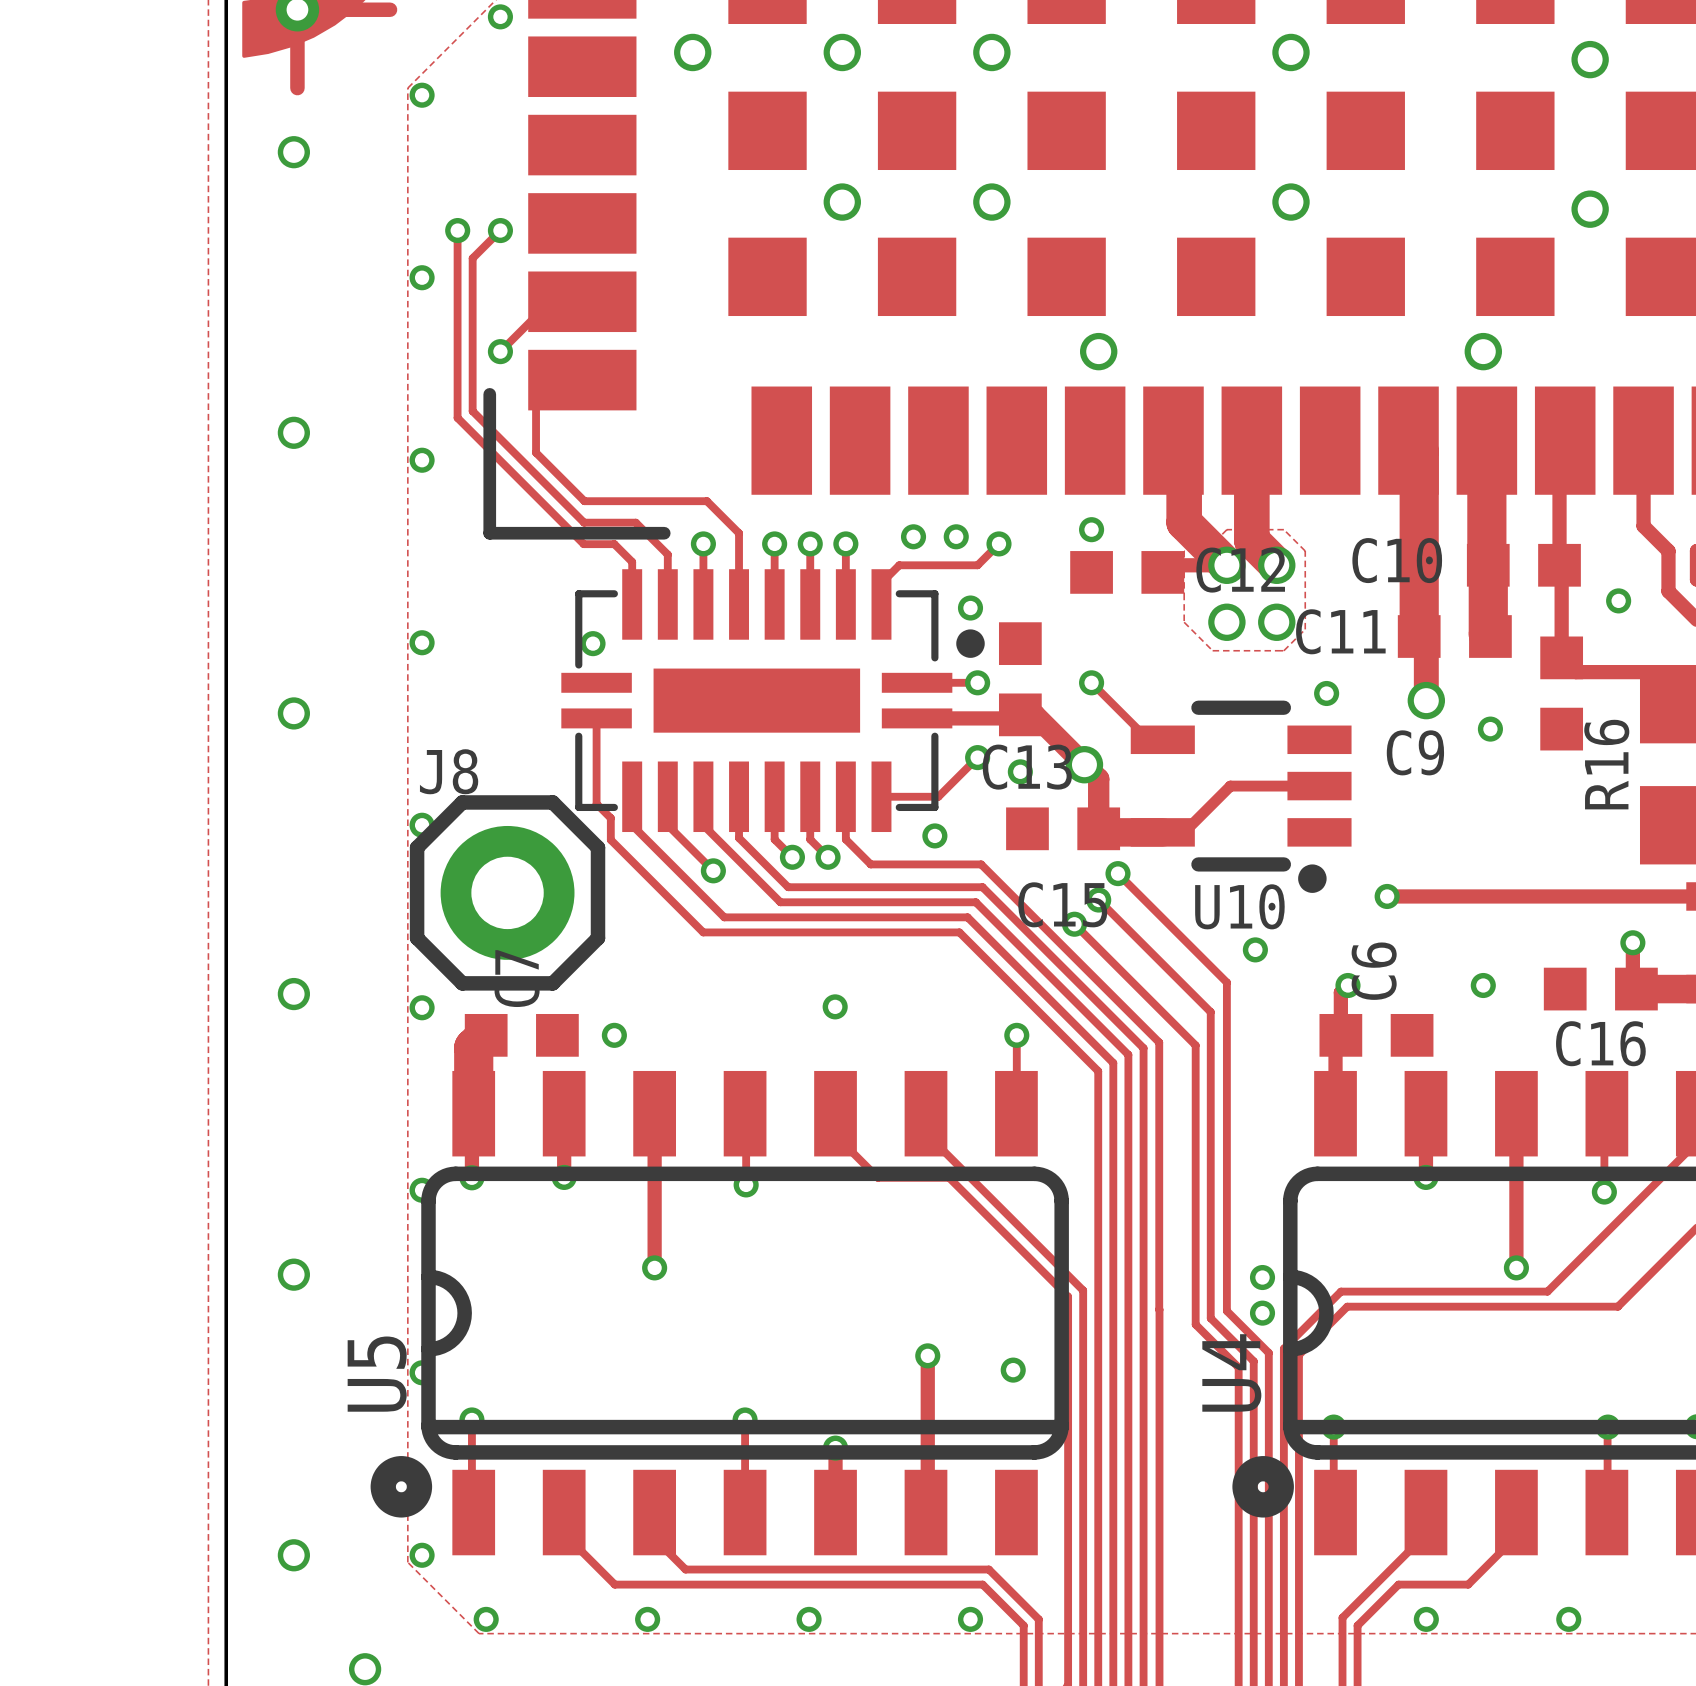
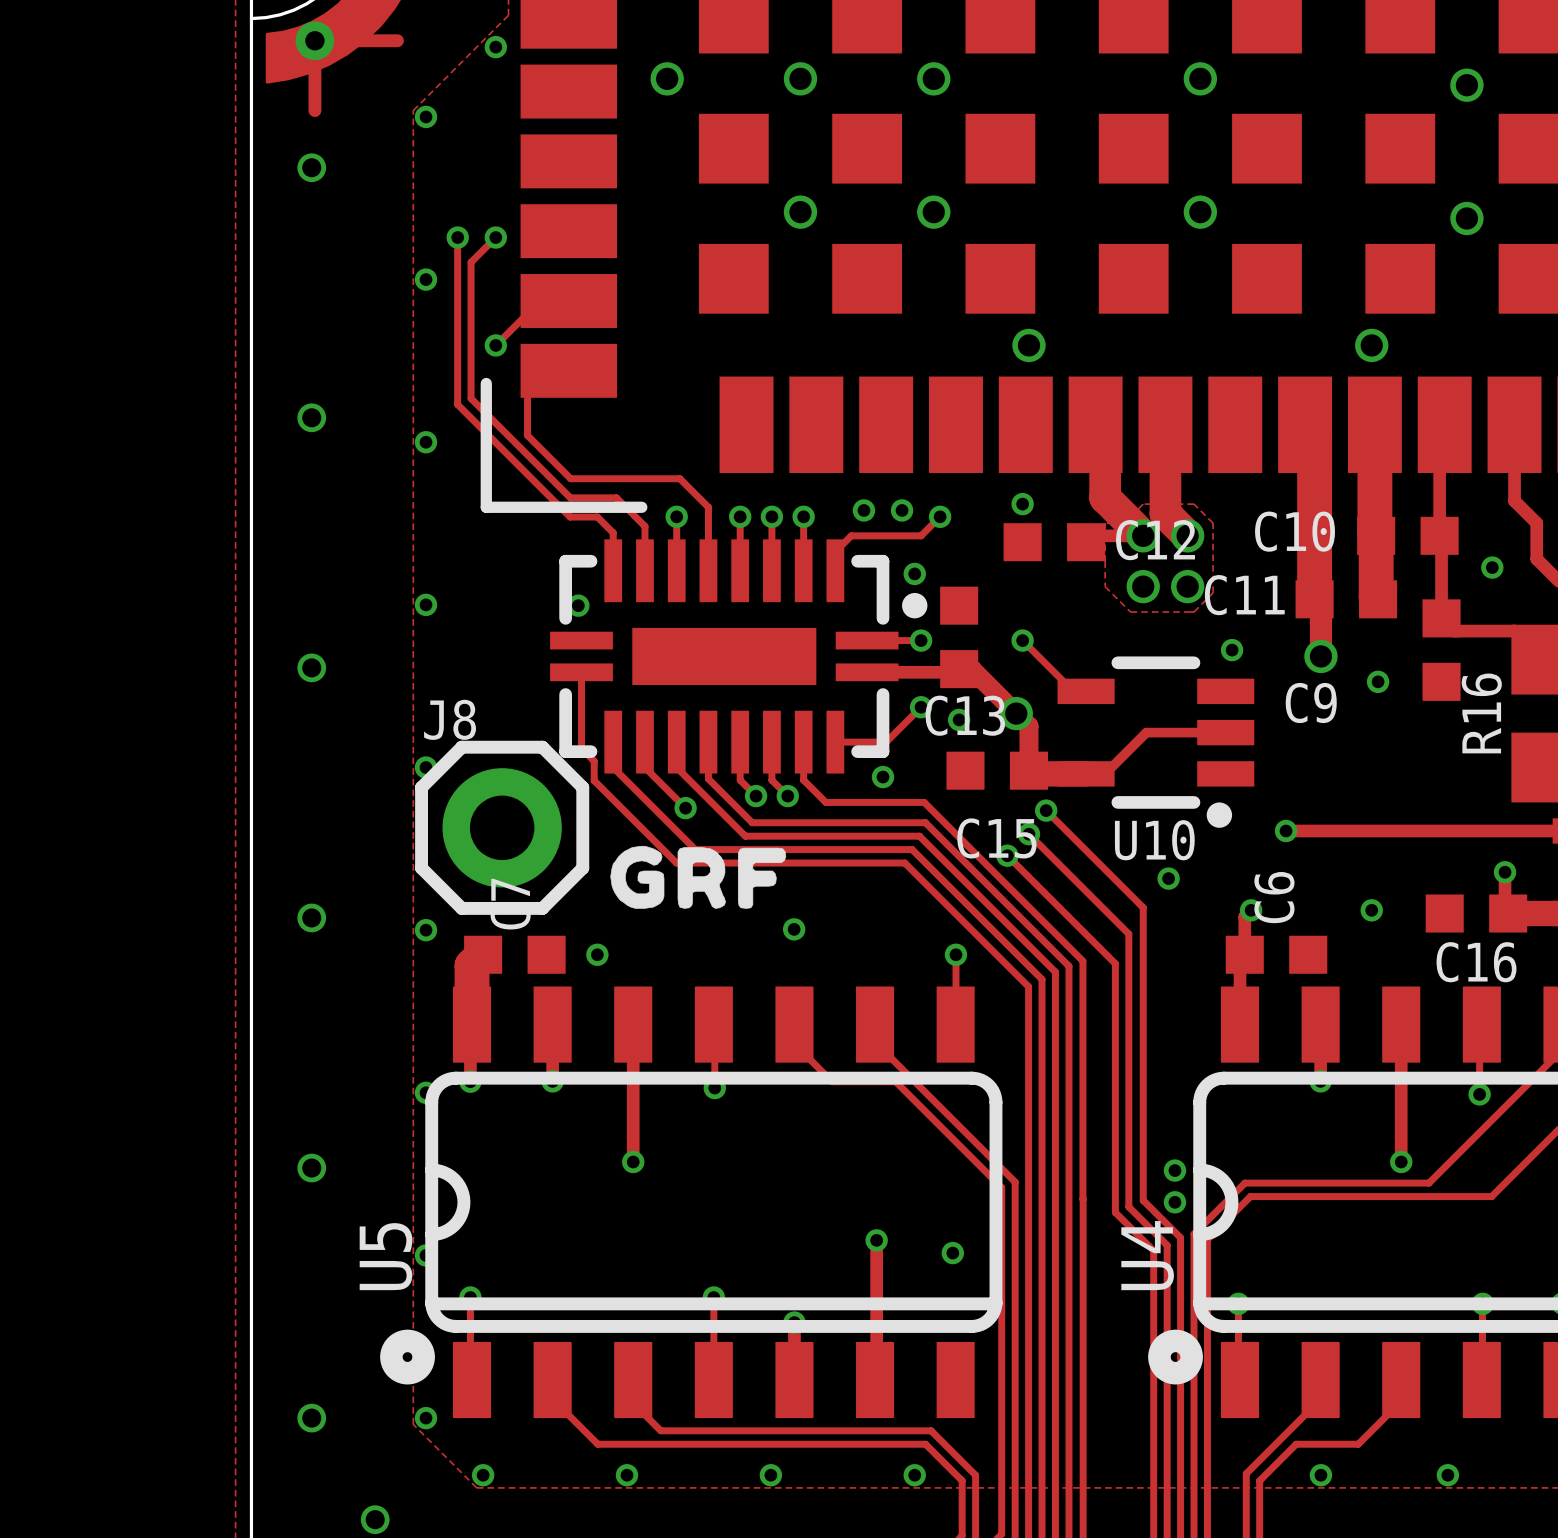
part footprint: [561, 569, 985, 833] -> [550, 539, 928, 774]
drawing: none -> [610, 845, 787, 909]

